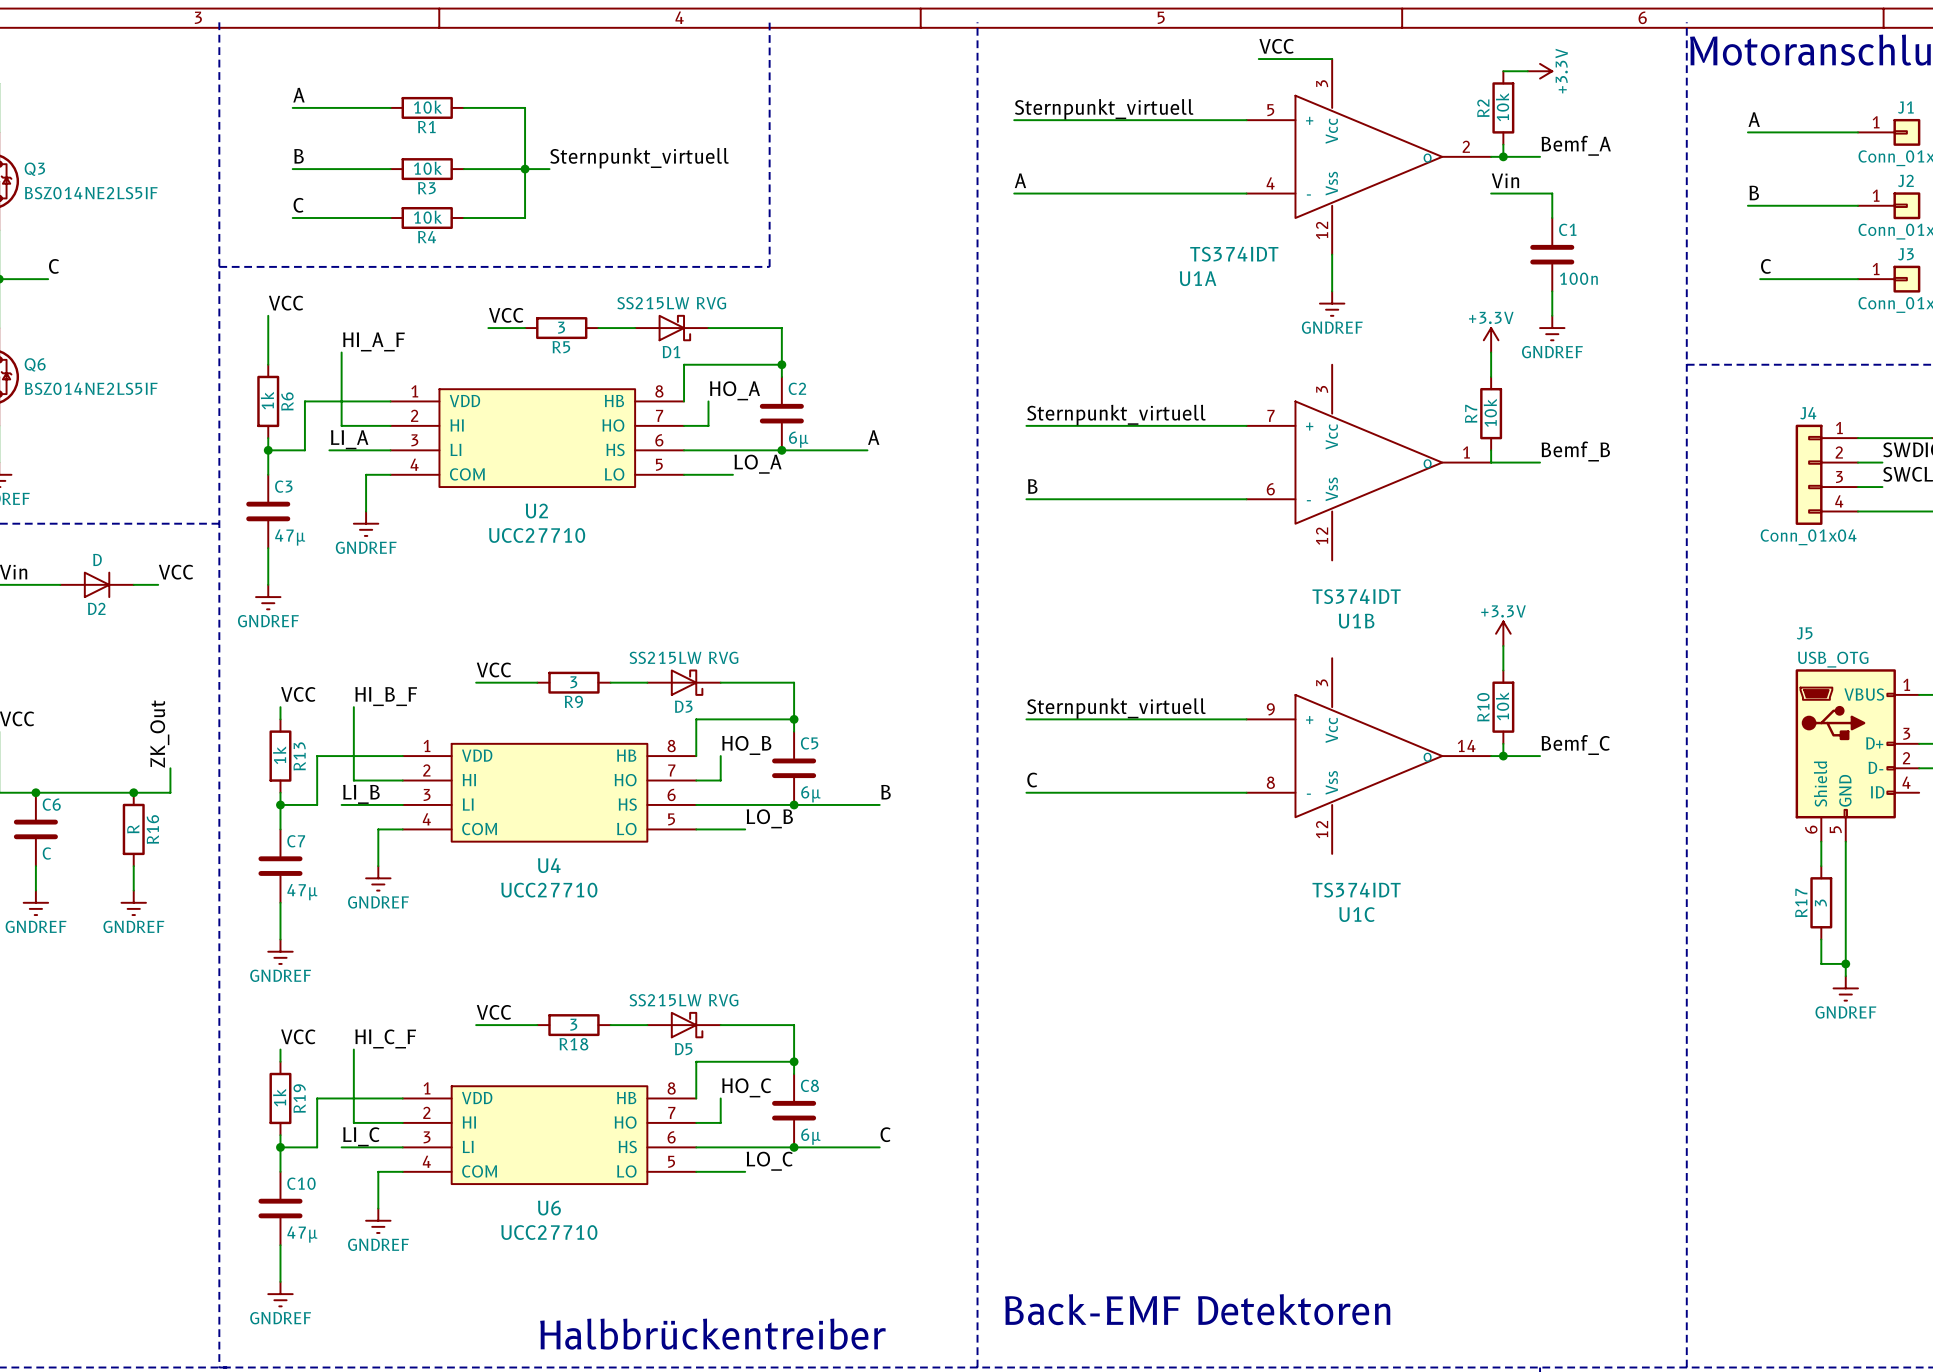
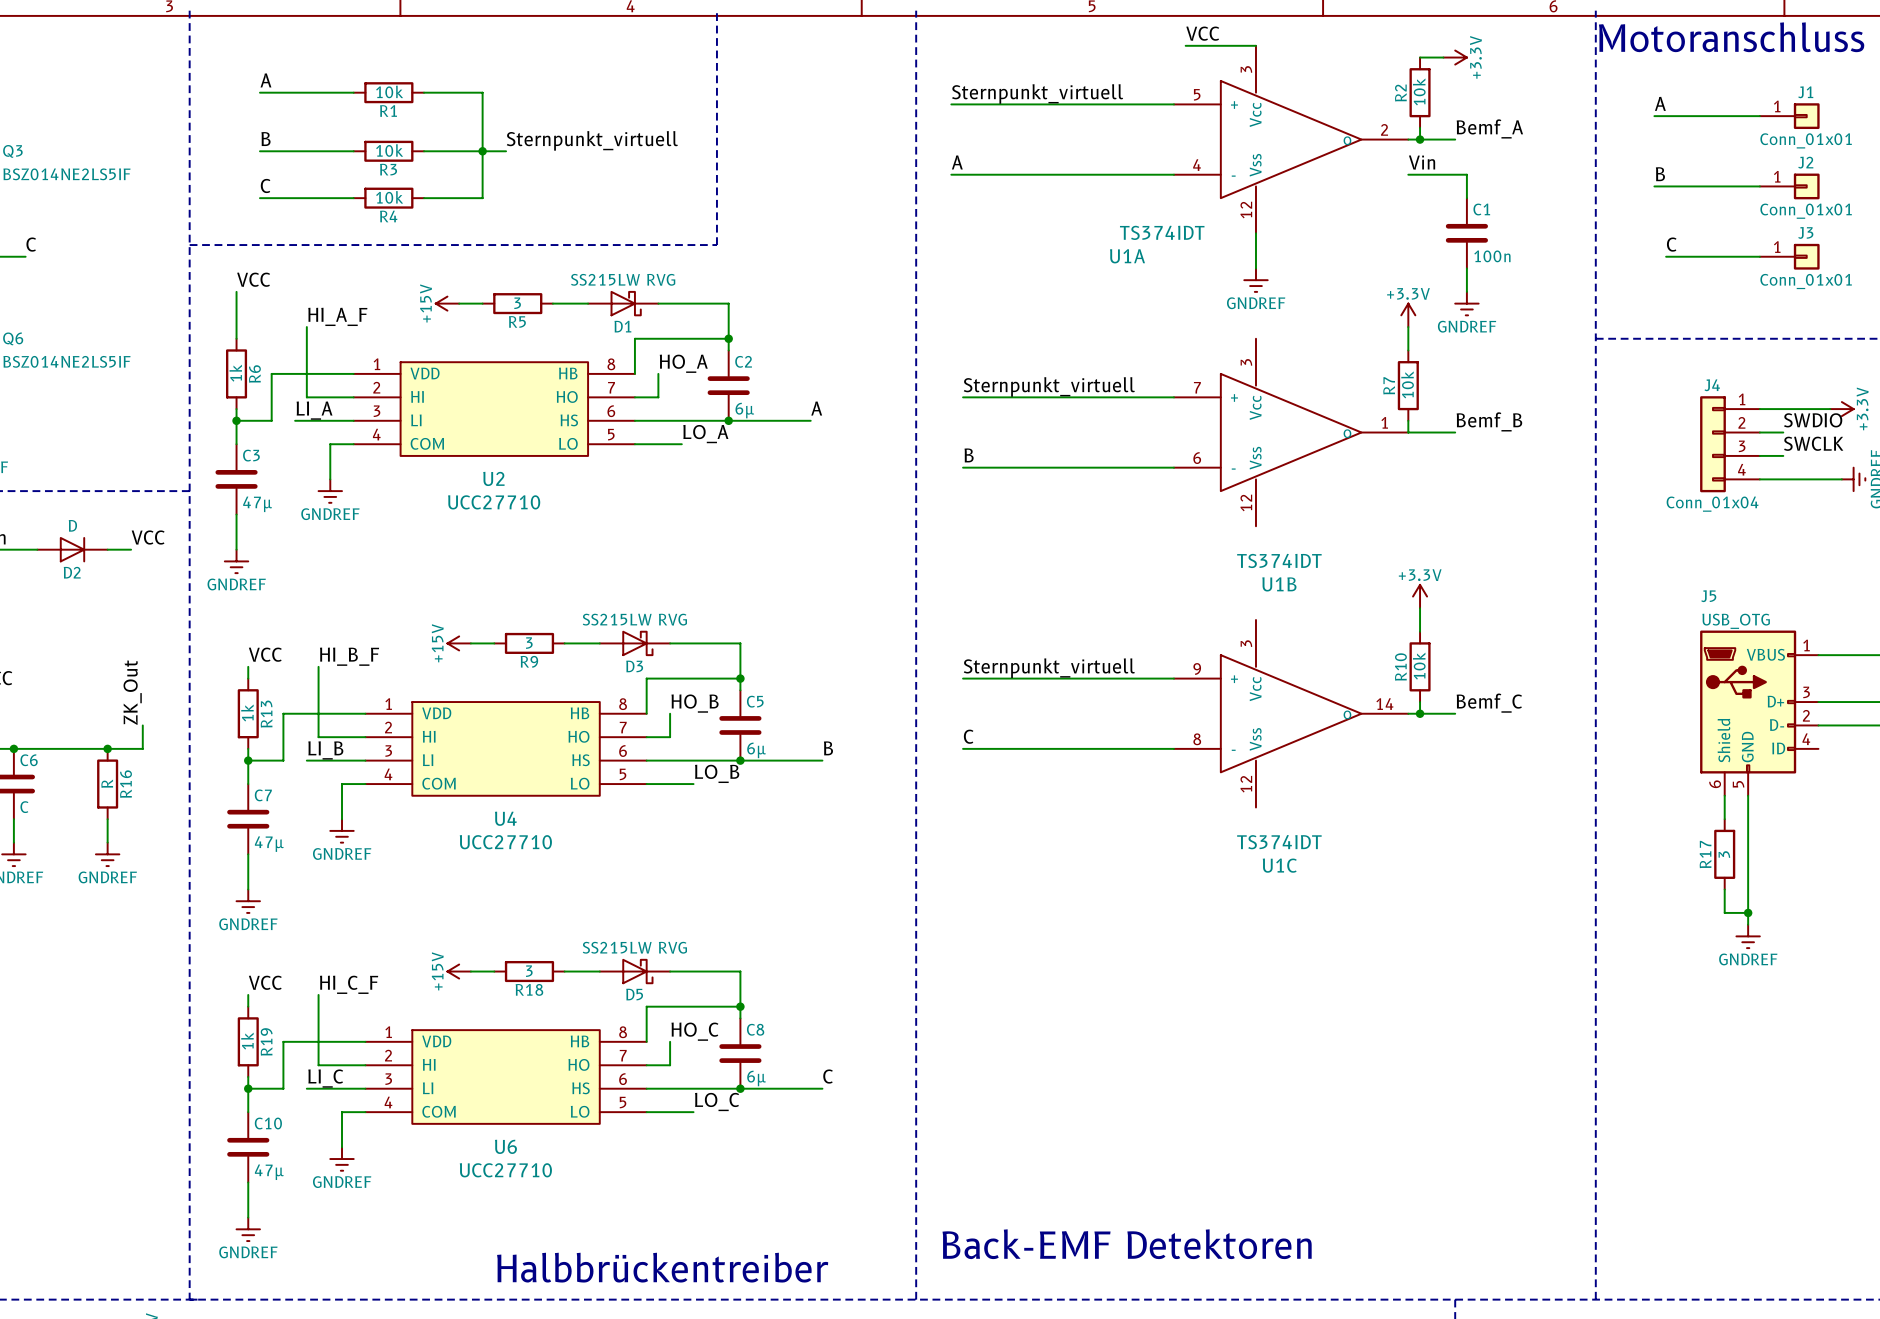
label: VCC (506, 315) -> none
power symbol: none -> +15V (447, 303)
label: VCC (493, 669) -> none
power symbol: none -> +15V (459, 643)
label: VCC (493, 1012) -> none
power symbol: none -> +15V (459, 971)

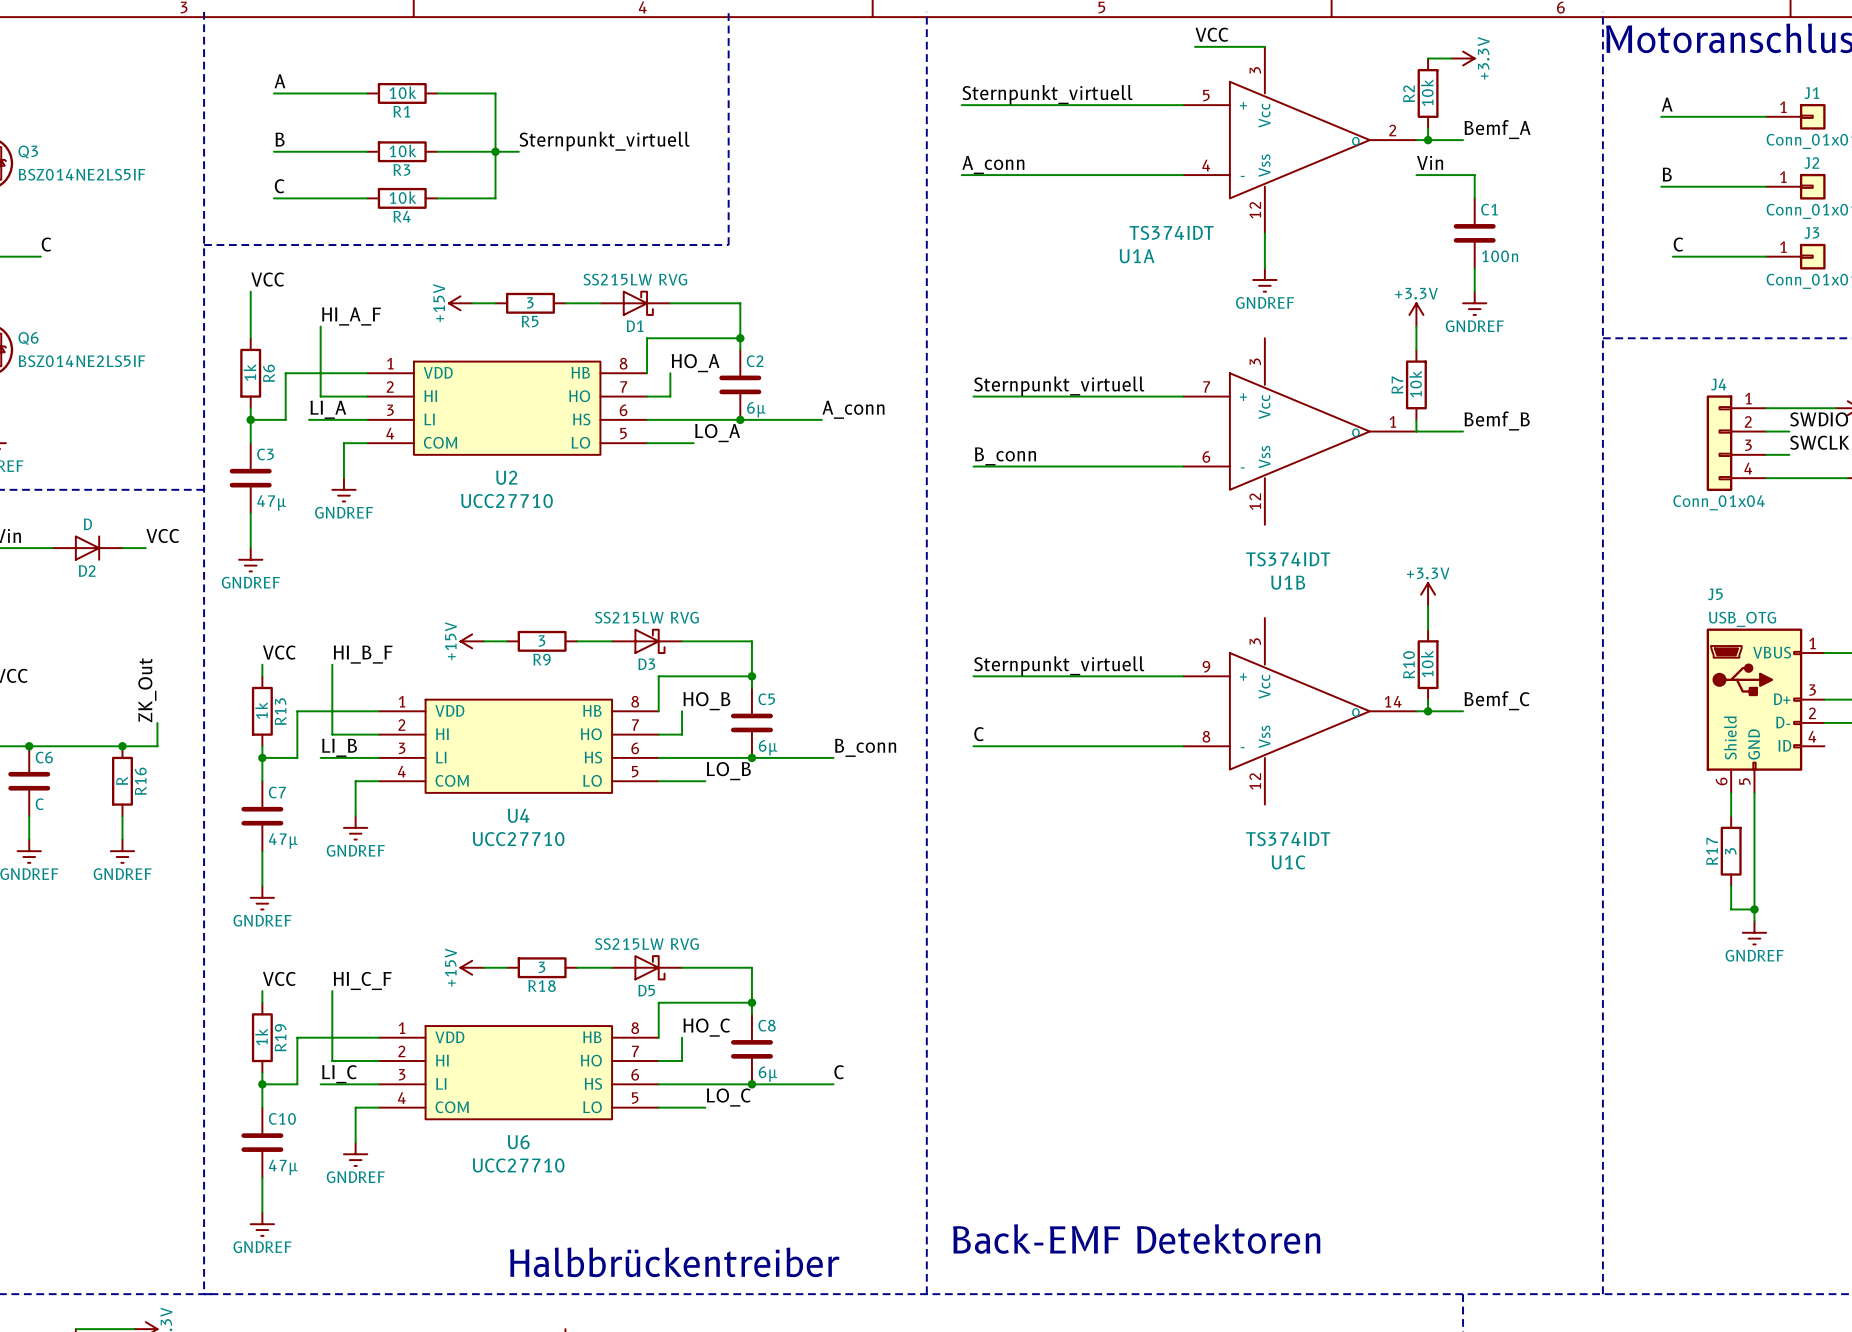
label: A (957, 162) -> A_conn (993, 164)
label: A (816, 408) -> A_conn (853, 409)
label: B (969, 455) -> B_conn (1005, 456)
label: B (828, 748) -> B_conn (865, 747)

